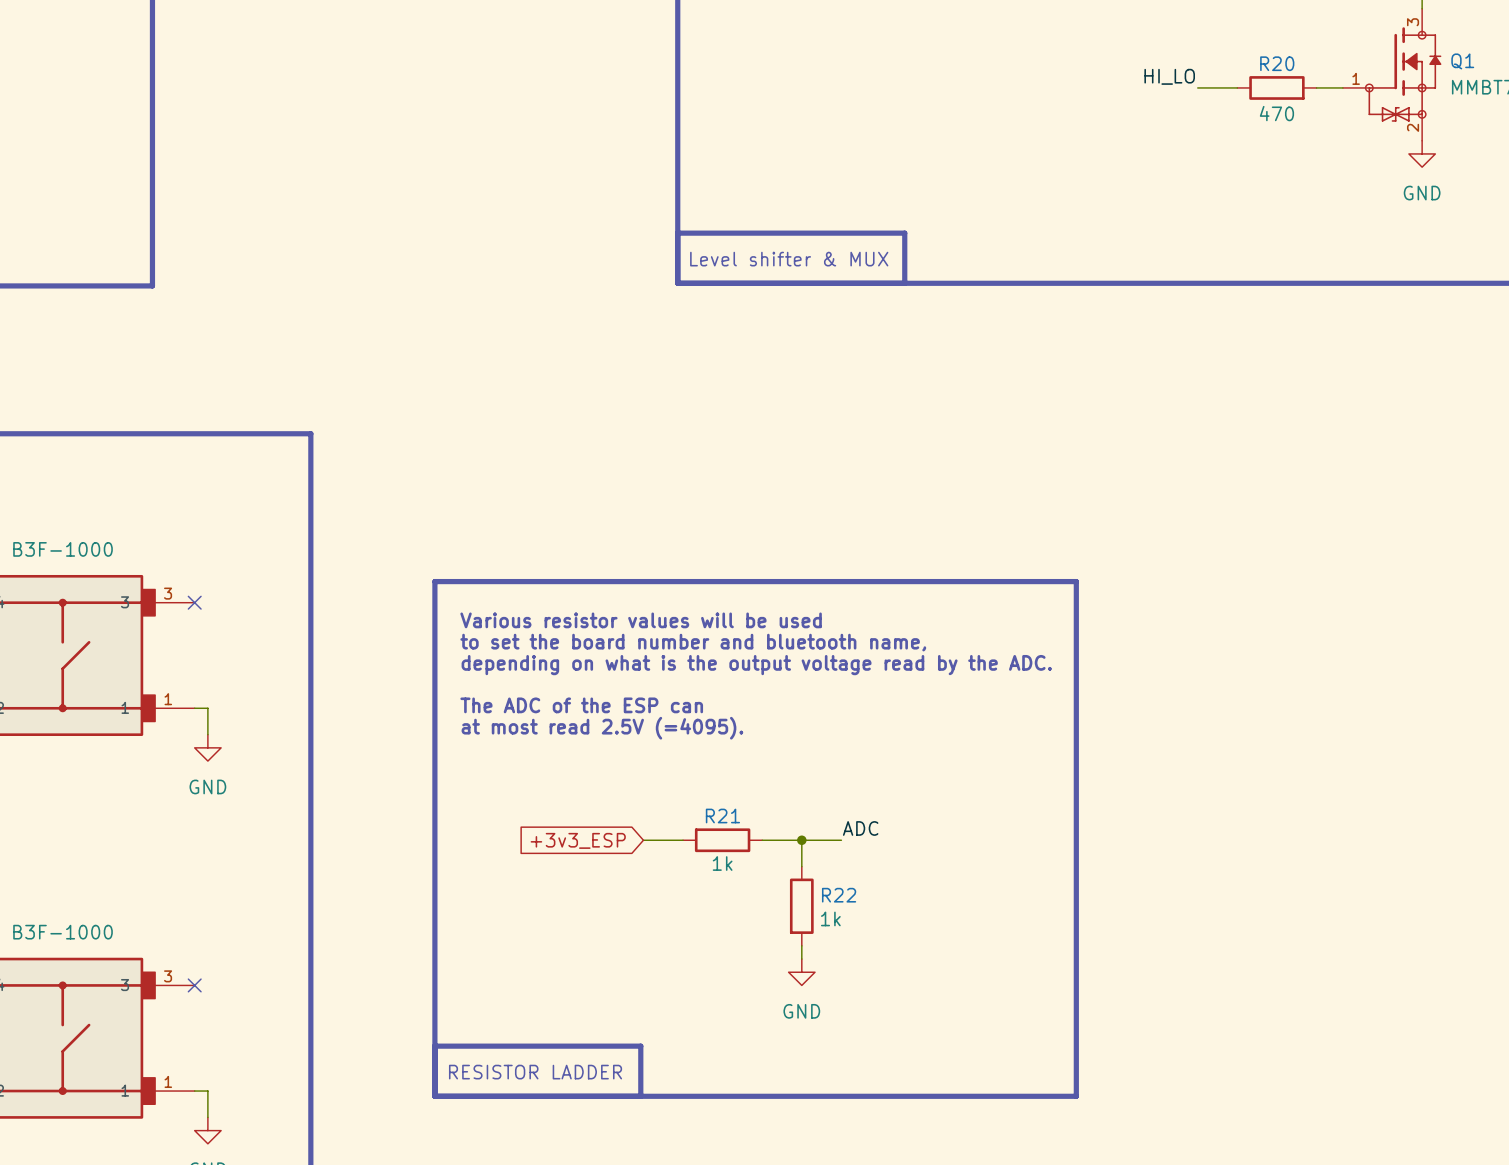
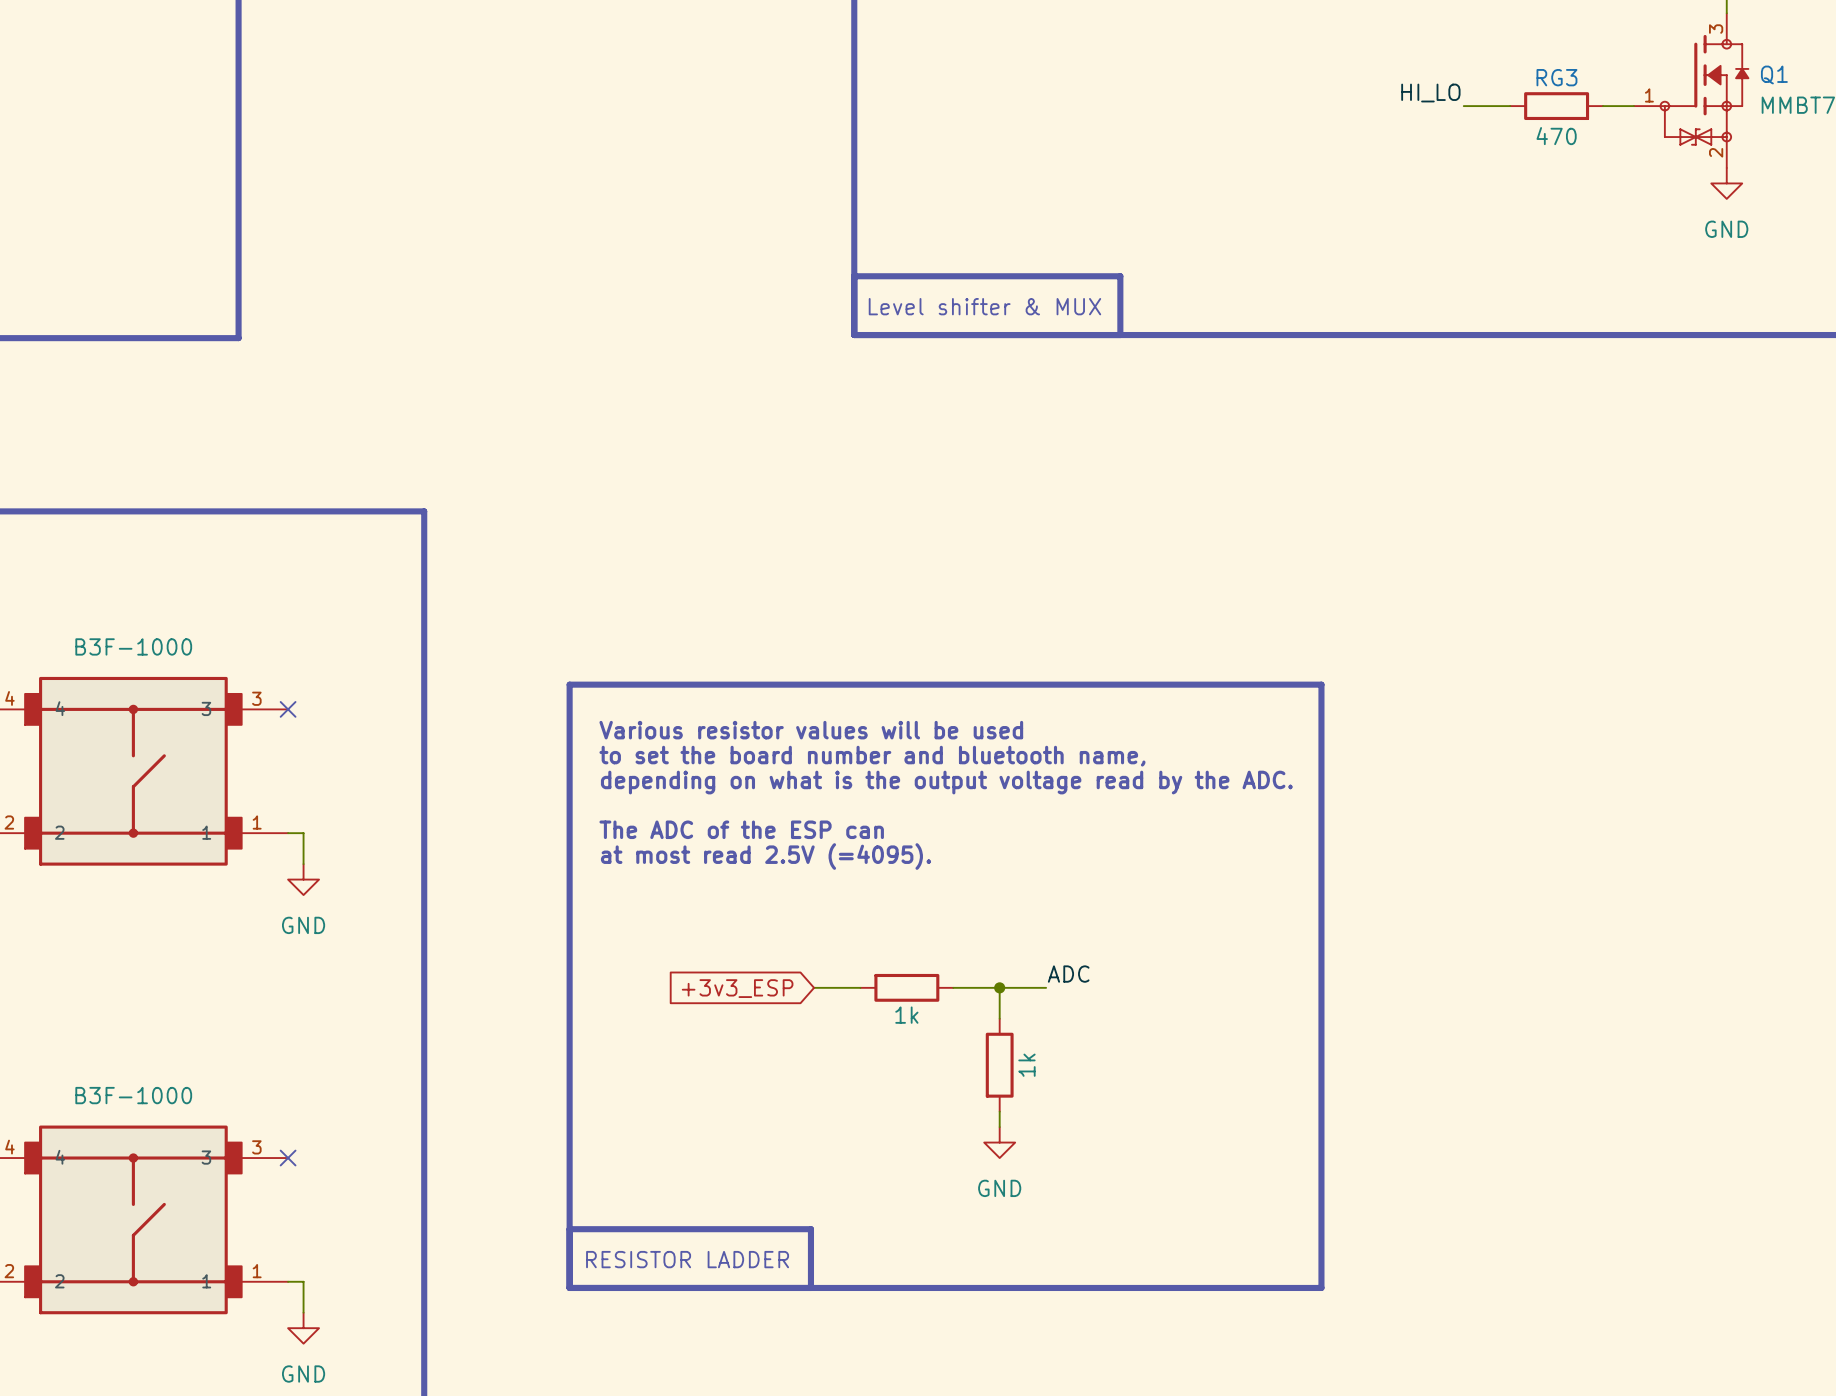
R20 name: R20 (1277, 63) -> RG3 (1556, 77)
R21 name: R21 (722, 816) -> none
R22 name: R22 (839, 895) -> none
R22 value rotation: 0° (830, 918) -> 90° counterclockwise (1026, 1065)

